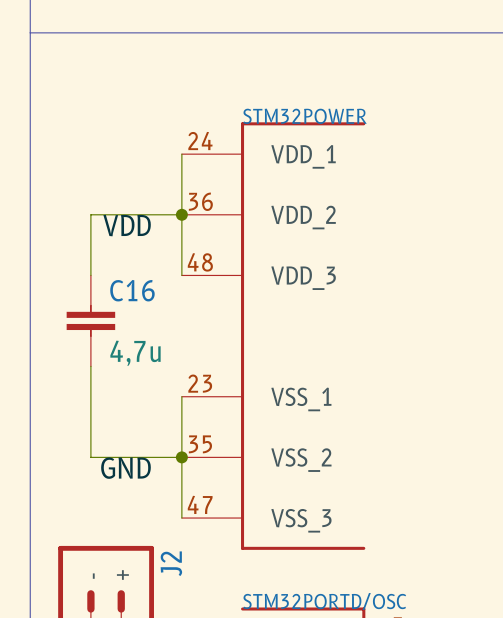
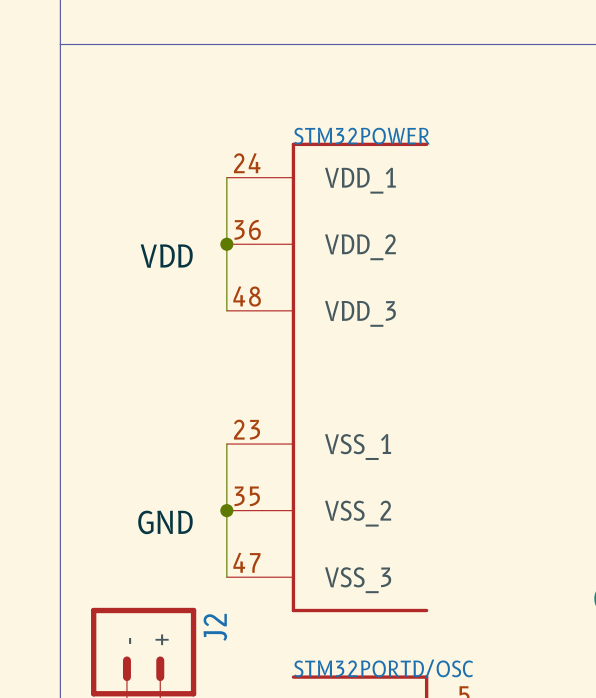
wire: (181, 214) (90, 214) (90, 275) -> none
C16: 4,7u (90, 320) -> none
wire: (90, 366) (90, 457) (181, 457) -> none

